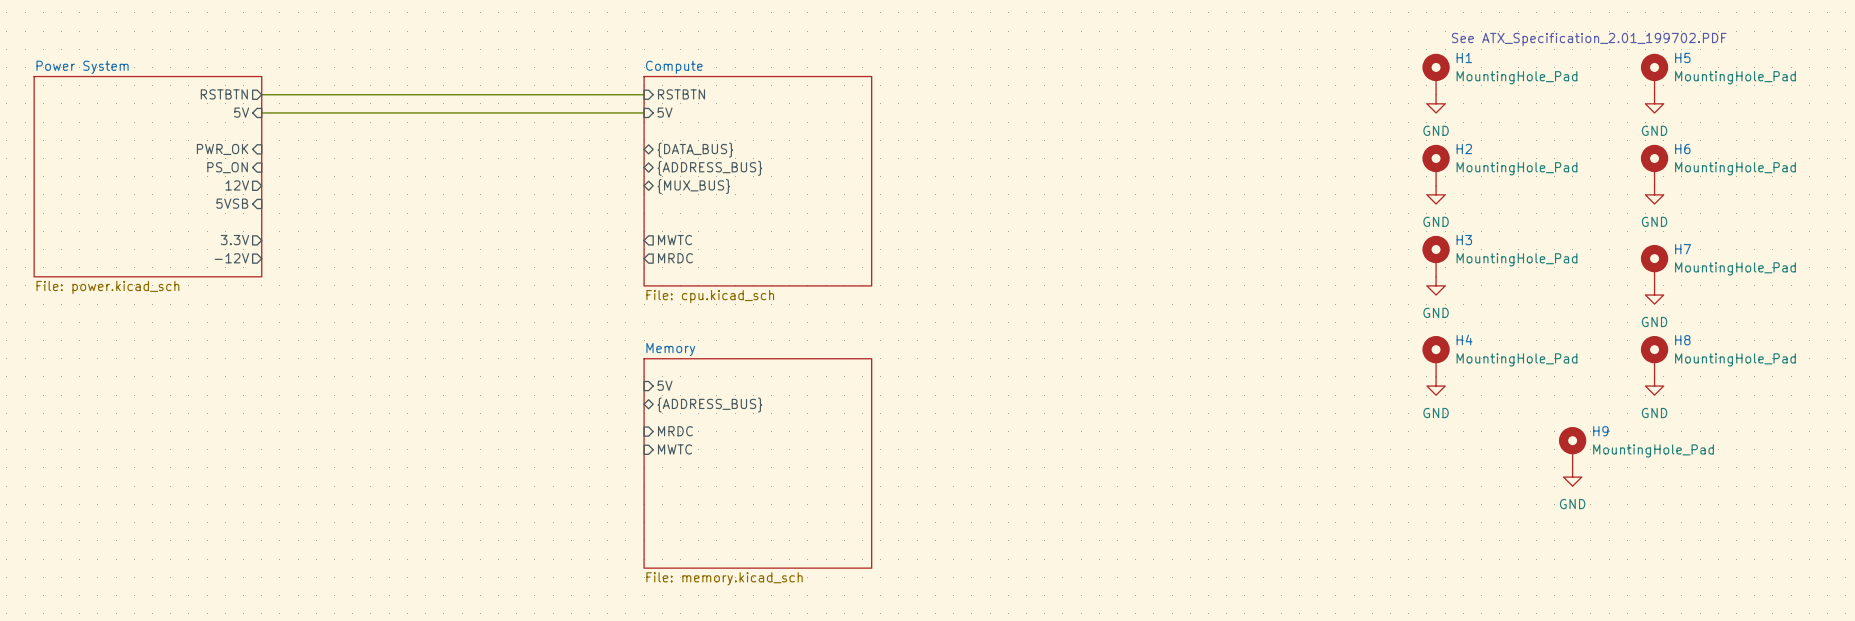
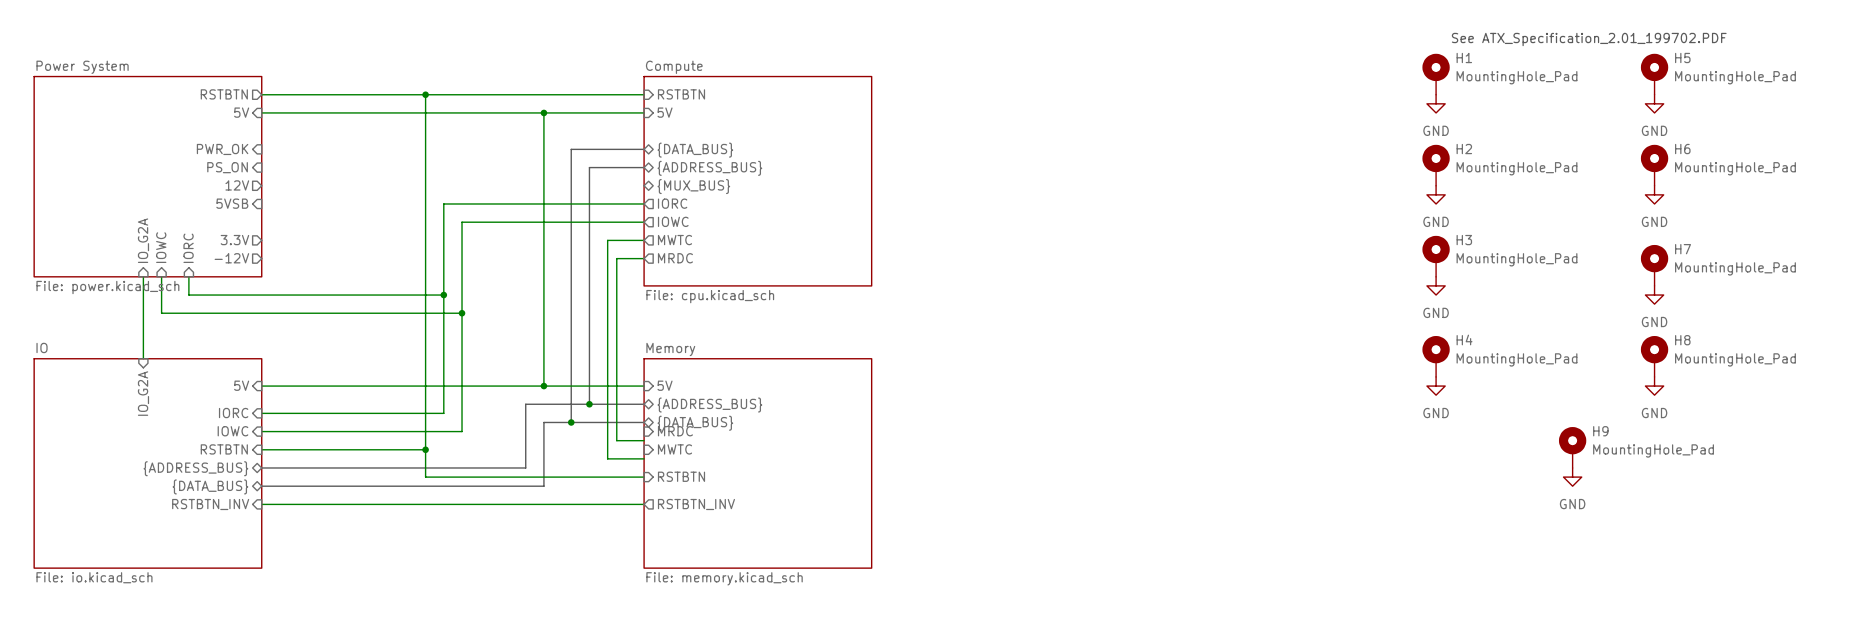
wire: none -> (425, 94) (425, 477) (644, 477)
junction: none -> (425, 94)
wire: none -> (543, 112) (543, 386)
junction: none -> (543, 112)
bus: none -> (644, 149) (571, 149) (571, 422)
bus: none -> (644, 167) (589, 167) (589, 404)
wire: none -> (644, 203) (443, 203) (443, 413) (261, 413)
sheet pin: none -> IORC (672, 203)
sheet pin: none -> IOWC (673, 221)
wire: none -> (644, 222) (462, 222) (462, 431) (261, 431)
sheet pin: none -> IO_G2A (143, 240)
wire: none -> (644, 240) (607, 240) (607, 458) (644, 458)
sheet pin: none -> IOWC (161, 247)
sheet pin: none -> IORC (188, 248)
wire: none -> (644, 258) (616, 258) (616, 440) (644, 440)
wire: none -> (143, 276) (143, 358)
wire: none -> (161, 276) (161, 313) (462, 313)
wire: none -> (188, 276) (188, 295) (443, 295)
junction: none -> (443, 295)
junction: none -> (462, 313)
sheet pin: none -> 5V (241, 385)
wire: none -> (261, 386) (644, 386)
junction: none -> (543, 386)
sheet pin: none -> IO_G2A (143, 393)
junction: none -> (589, 404)
bus: none -> (644, 404) (525, 404) (525, 467) (261, 467)
sheet pin: none -> IORC (233, 413)
junction: none -> (571, 422)
bus: none -> (644, 422) (543, 422) (543, 486) (261, 486)
sheet pin: none -> {DATA_BUS} (695, 423)
sheet pin: none -> IOWC (232, 431)
sheet pin: none -> RSTBTN (224, 449)
wire: none -> (261, 449) (425, 449)
junction: none -> (425, 449)
sheet IO: none -> File: io.kicad_sch (147, 463)
sheet pin: none -> {ADDRESS_BUS} (195, 468)
sheet pin: none -> RSTBTN (681, 476)
sheet pin: none -> {DATA_BUS} (210, 486)
sheet pin: none -> RSTBTN_INV (210, 504)
wire: none -> (261, 504) (644, 504)
sheet pin: none -> RSTBTN_INV (696, 504)

